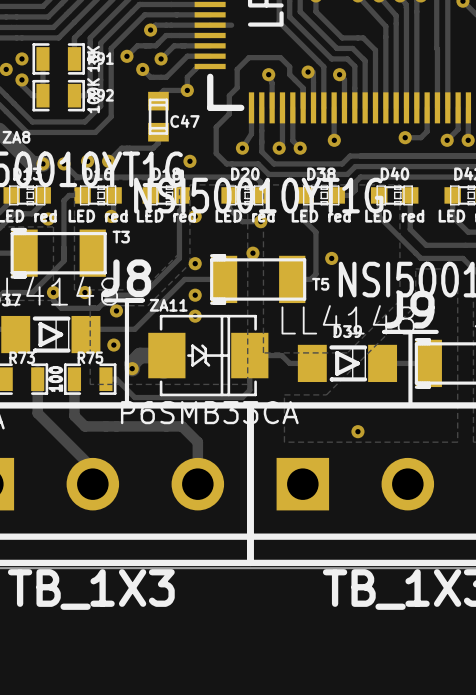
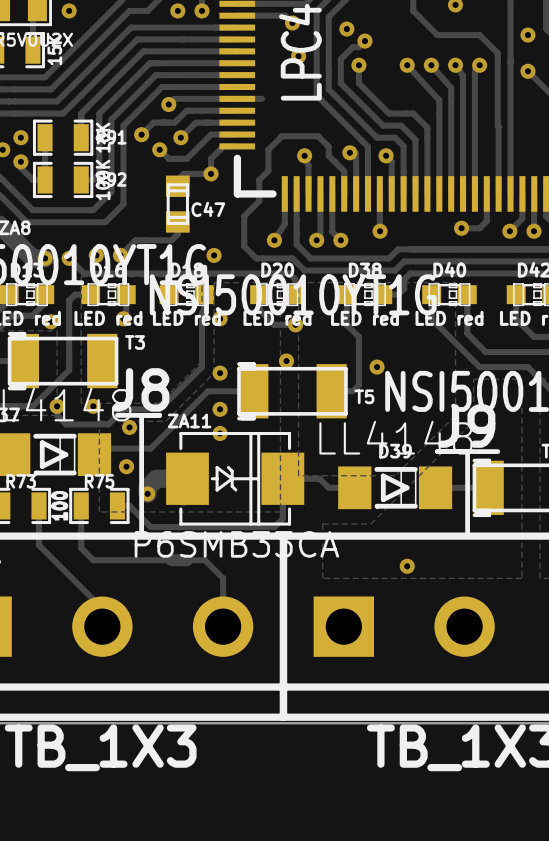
track width: thick (37, 371) (37, 413) (92, 468) (92, 484) -> thin (38, 496) (38, 545) (102, 608) (102, 626)
track width: thick (74, 379) (74, 415) (84, 426) (153, 426) -> thin (81, 505) (81, 548) (93, 560) (171, 560)
track width: thick (166, 426) (182, 426) (197, 442) (197, 484) -> thin (186, 560) (205, 560) (223, 578) (223, 626)

